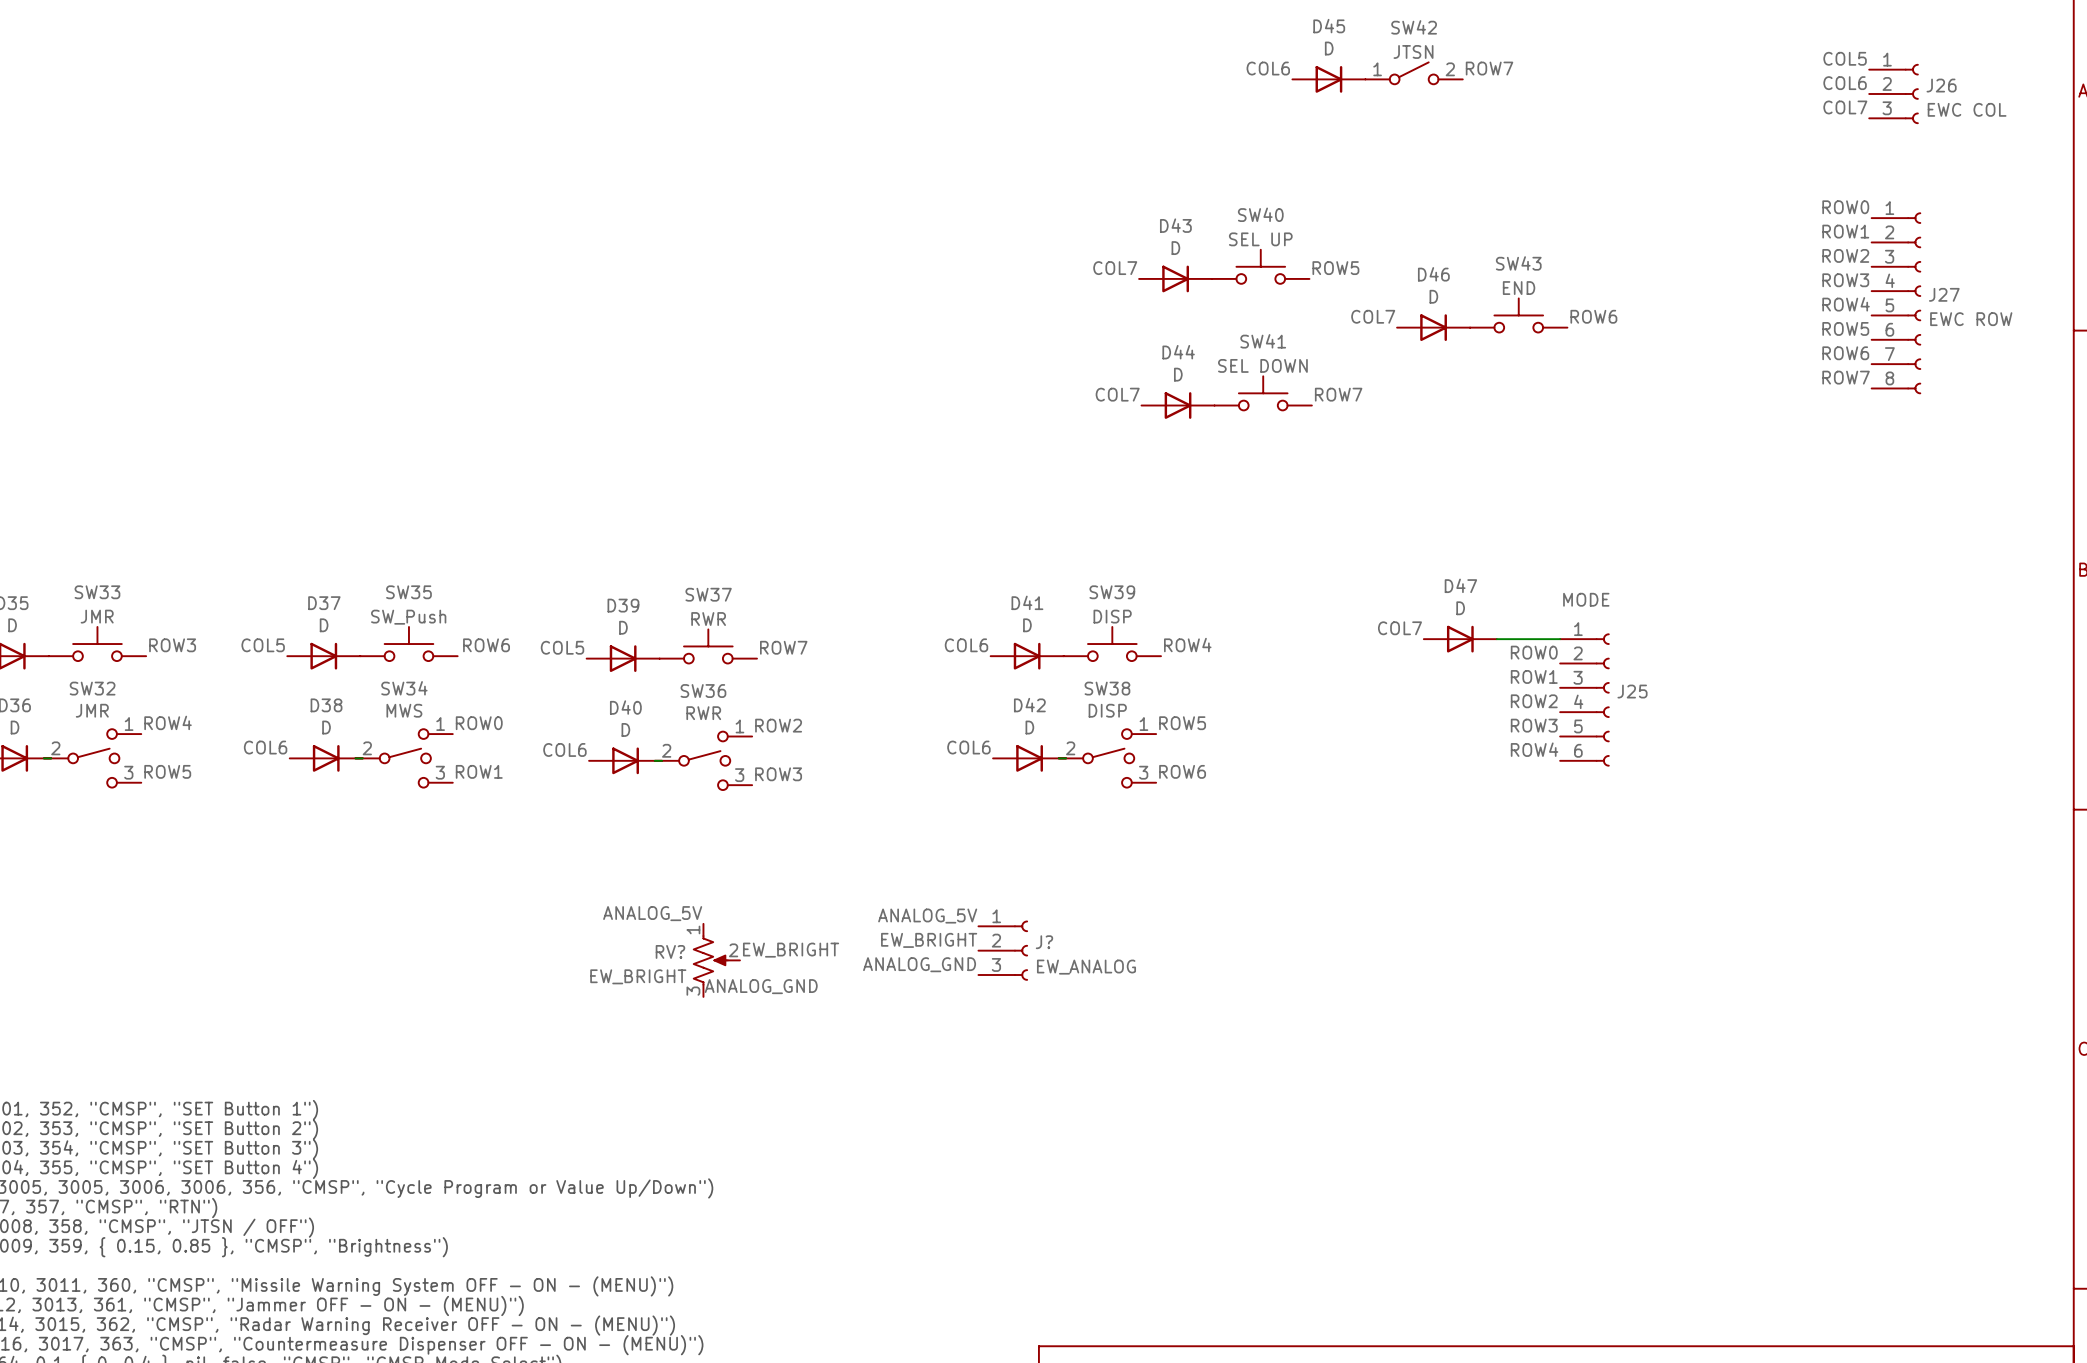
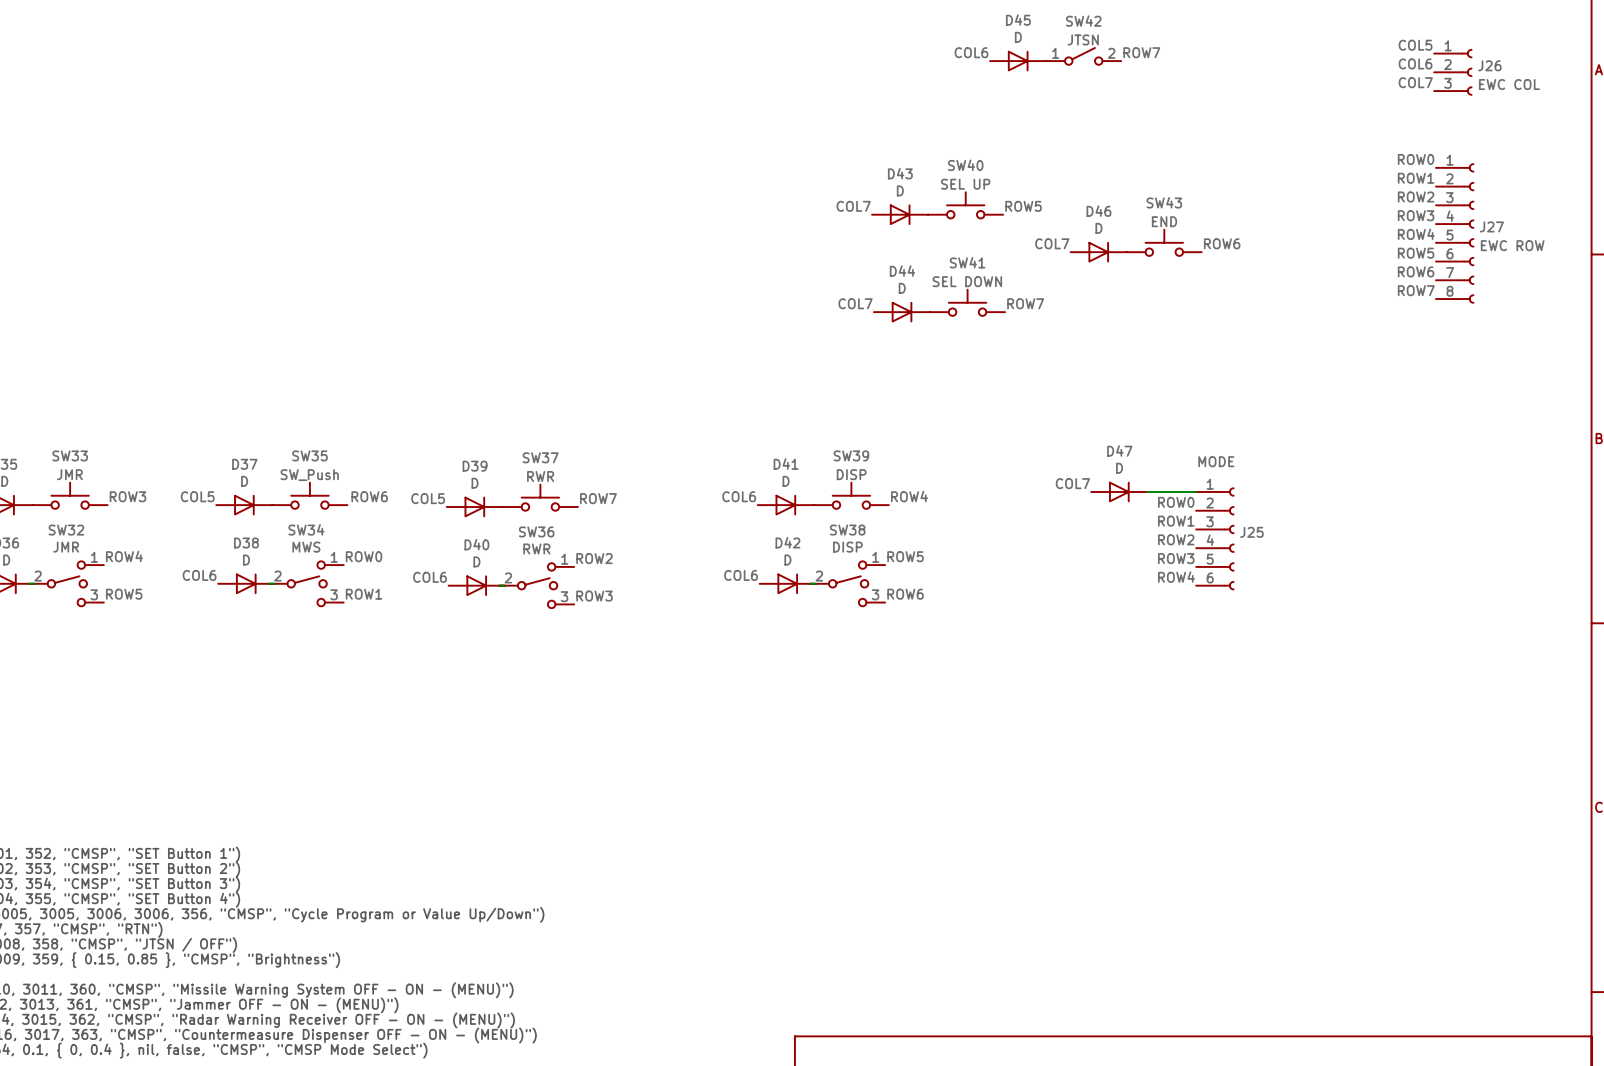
label: ANALOG_5V (652, 913) -> none
label: ANALOG_5V (927, 916) -> none
label: EW_BRIGHT (929, 940) -> none
label: EW_BRIGHT (791, 950) -> none
J?: EW_ANALOG (1003, 950) -> none
RV?: EW_BRIGHT (716, 960) -> none
label: ANALOG_GND (919, 964) -> none
label: ANALOG_GND (761, 986) -> none

